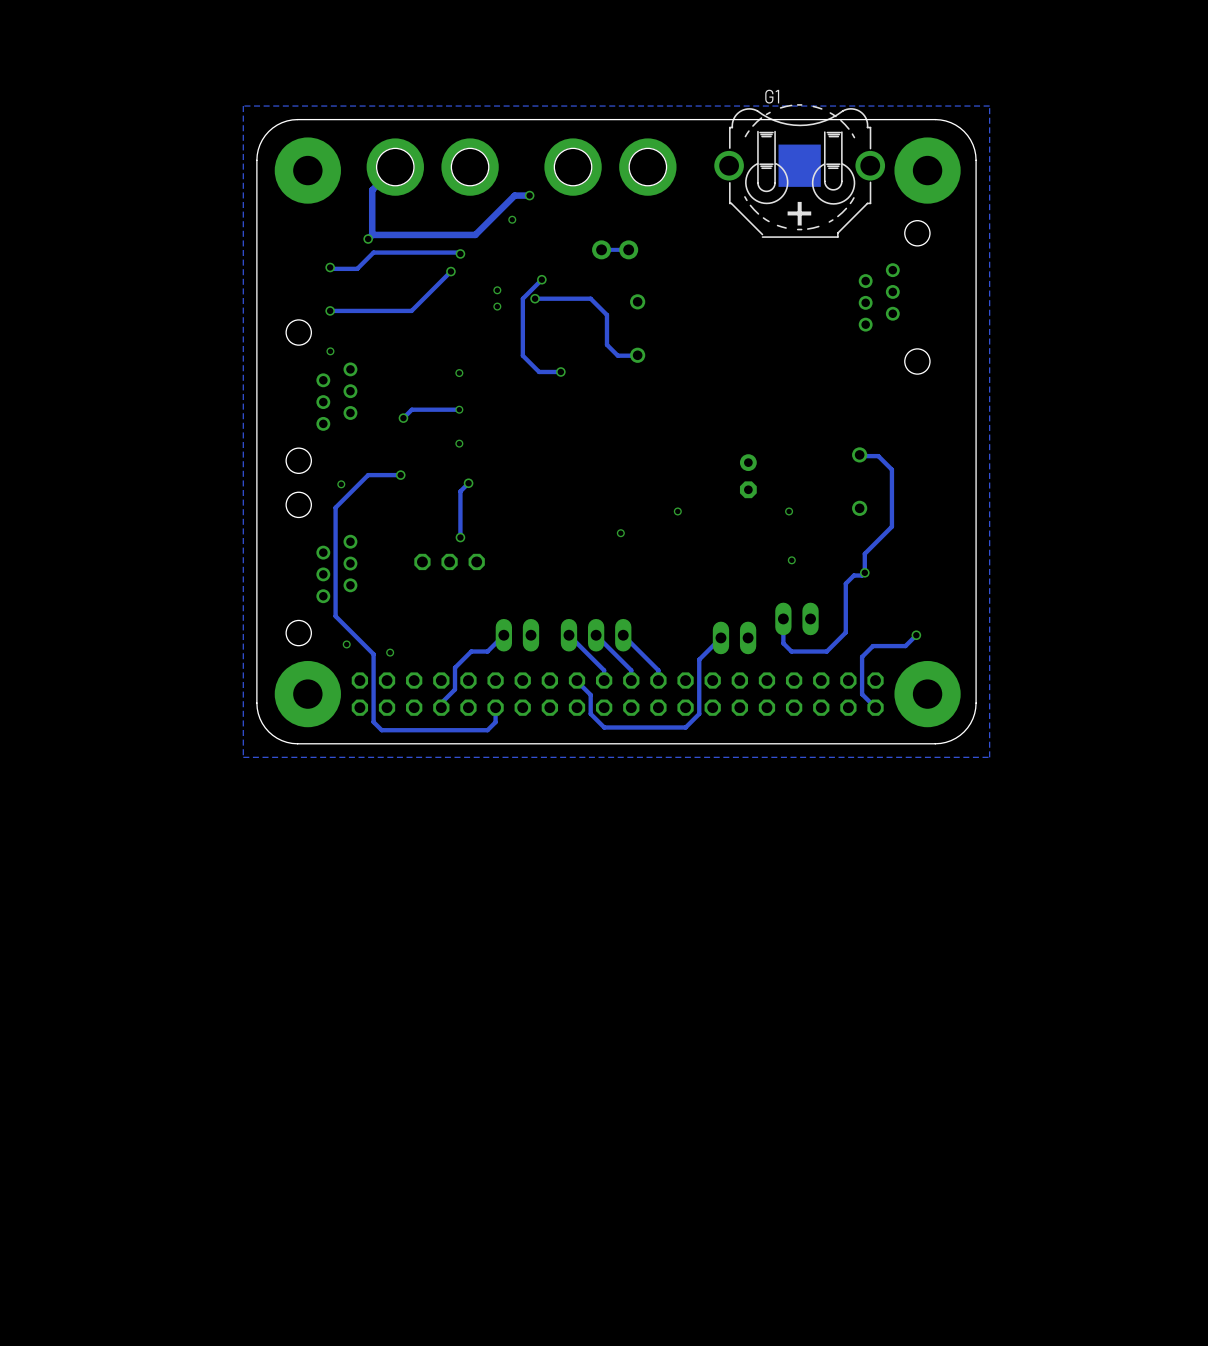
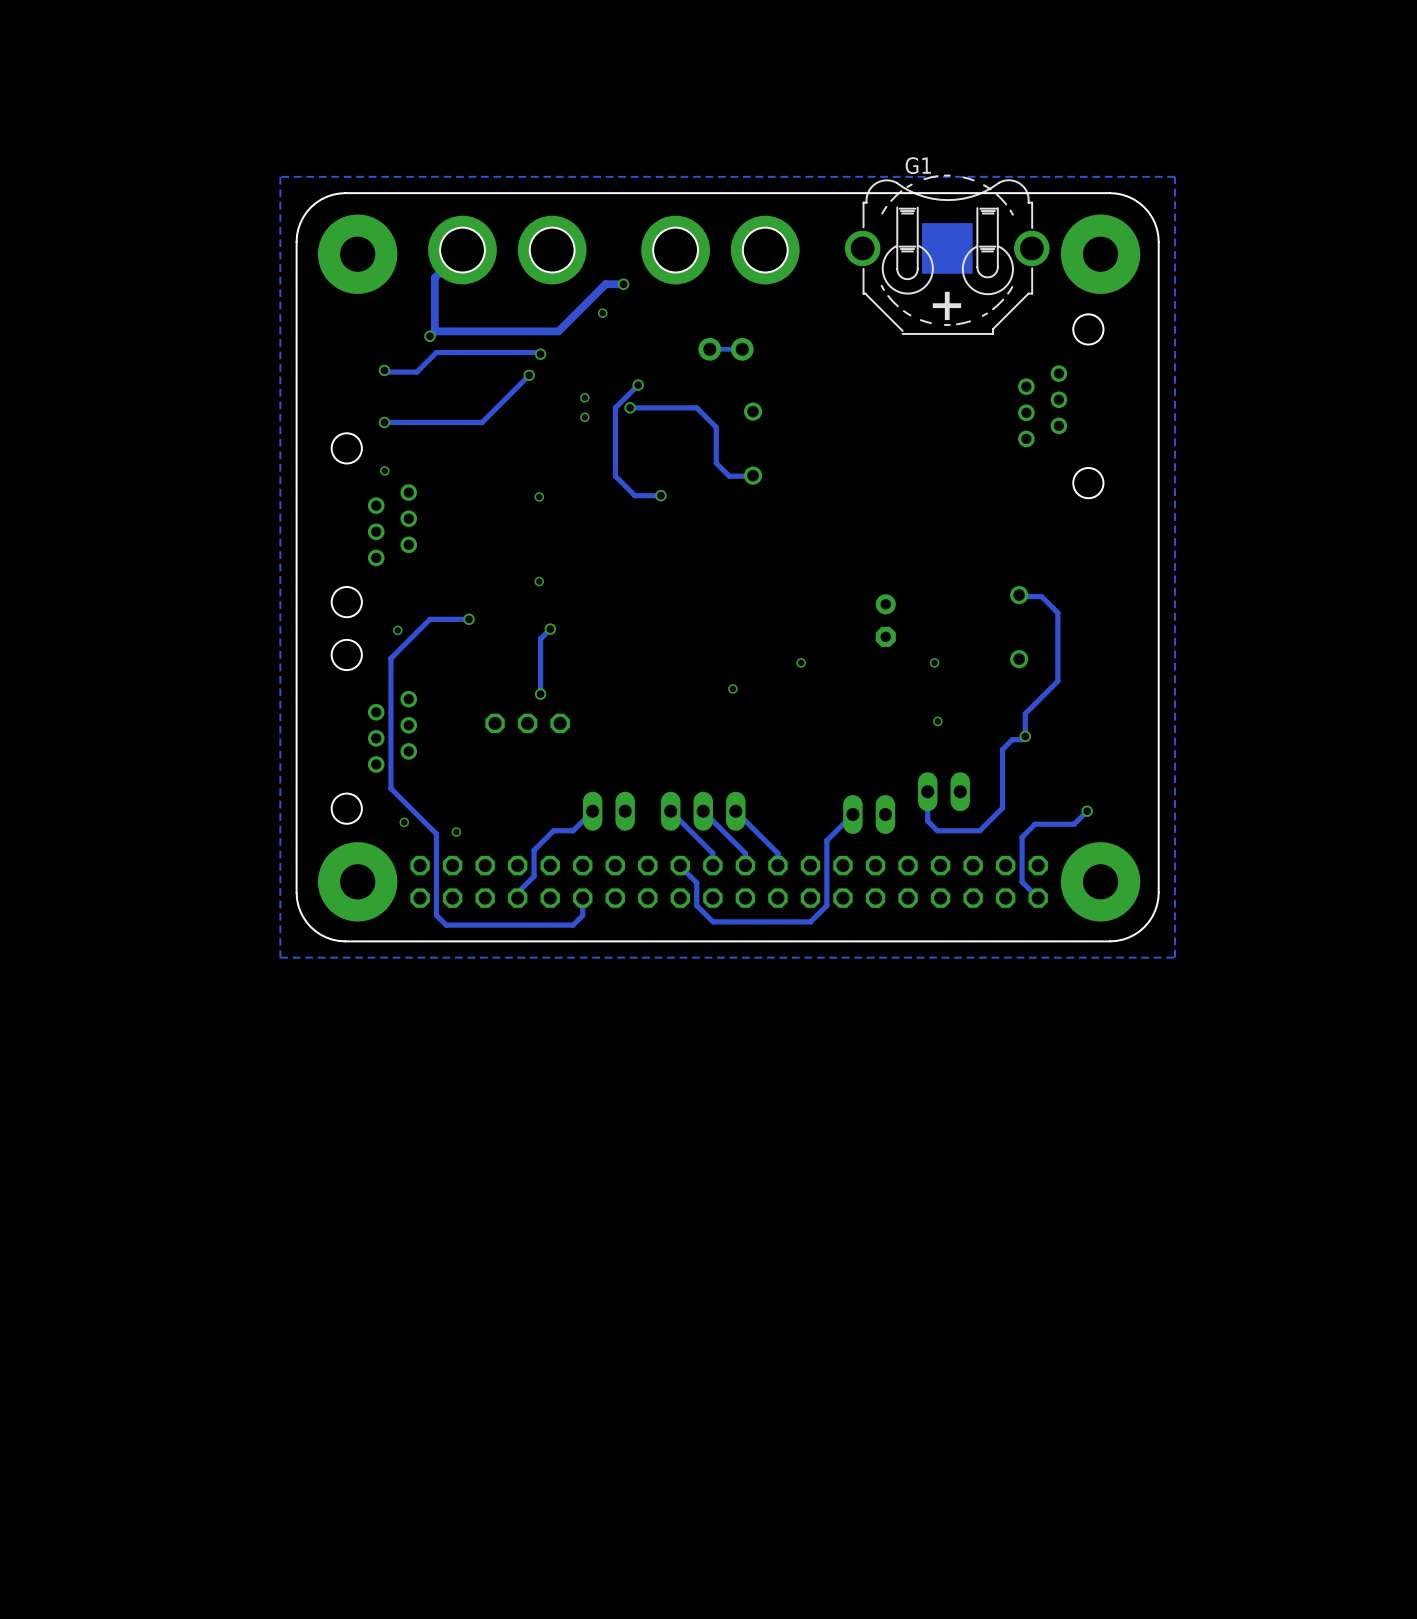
track: (459, 409) (411, 409) (403, 418) -> none
via: (459, 409) -> none
via: (403, 418) -> none

